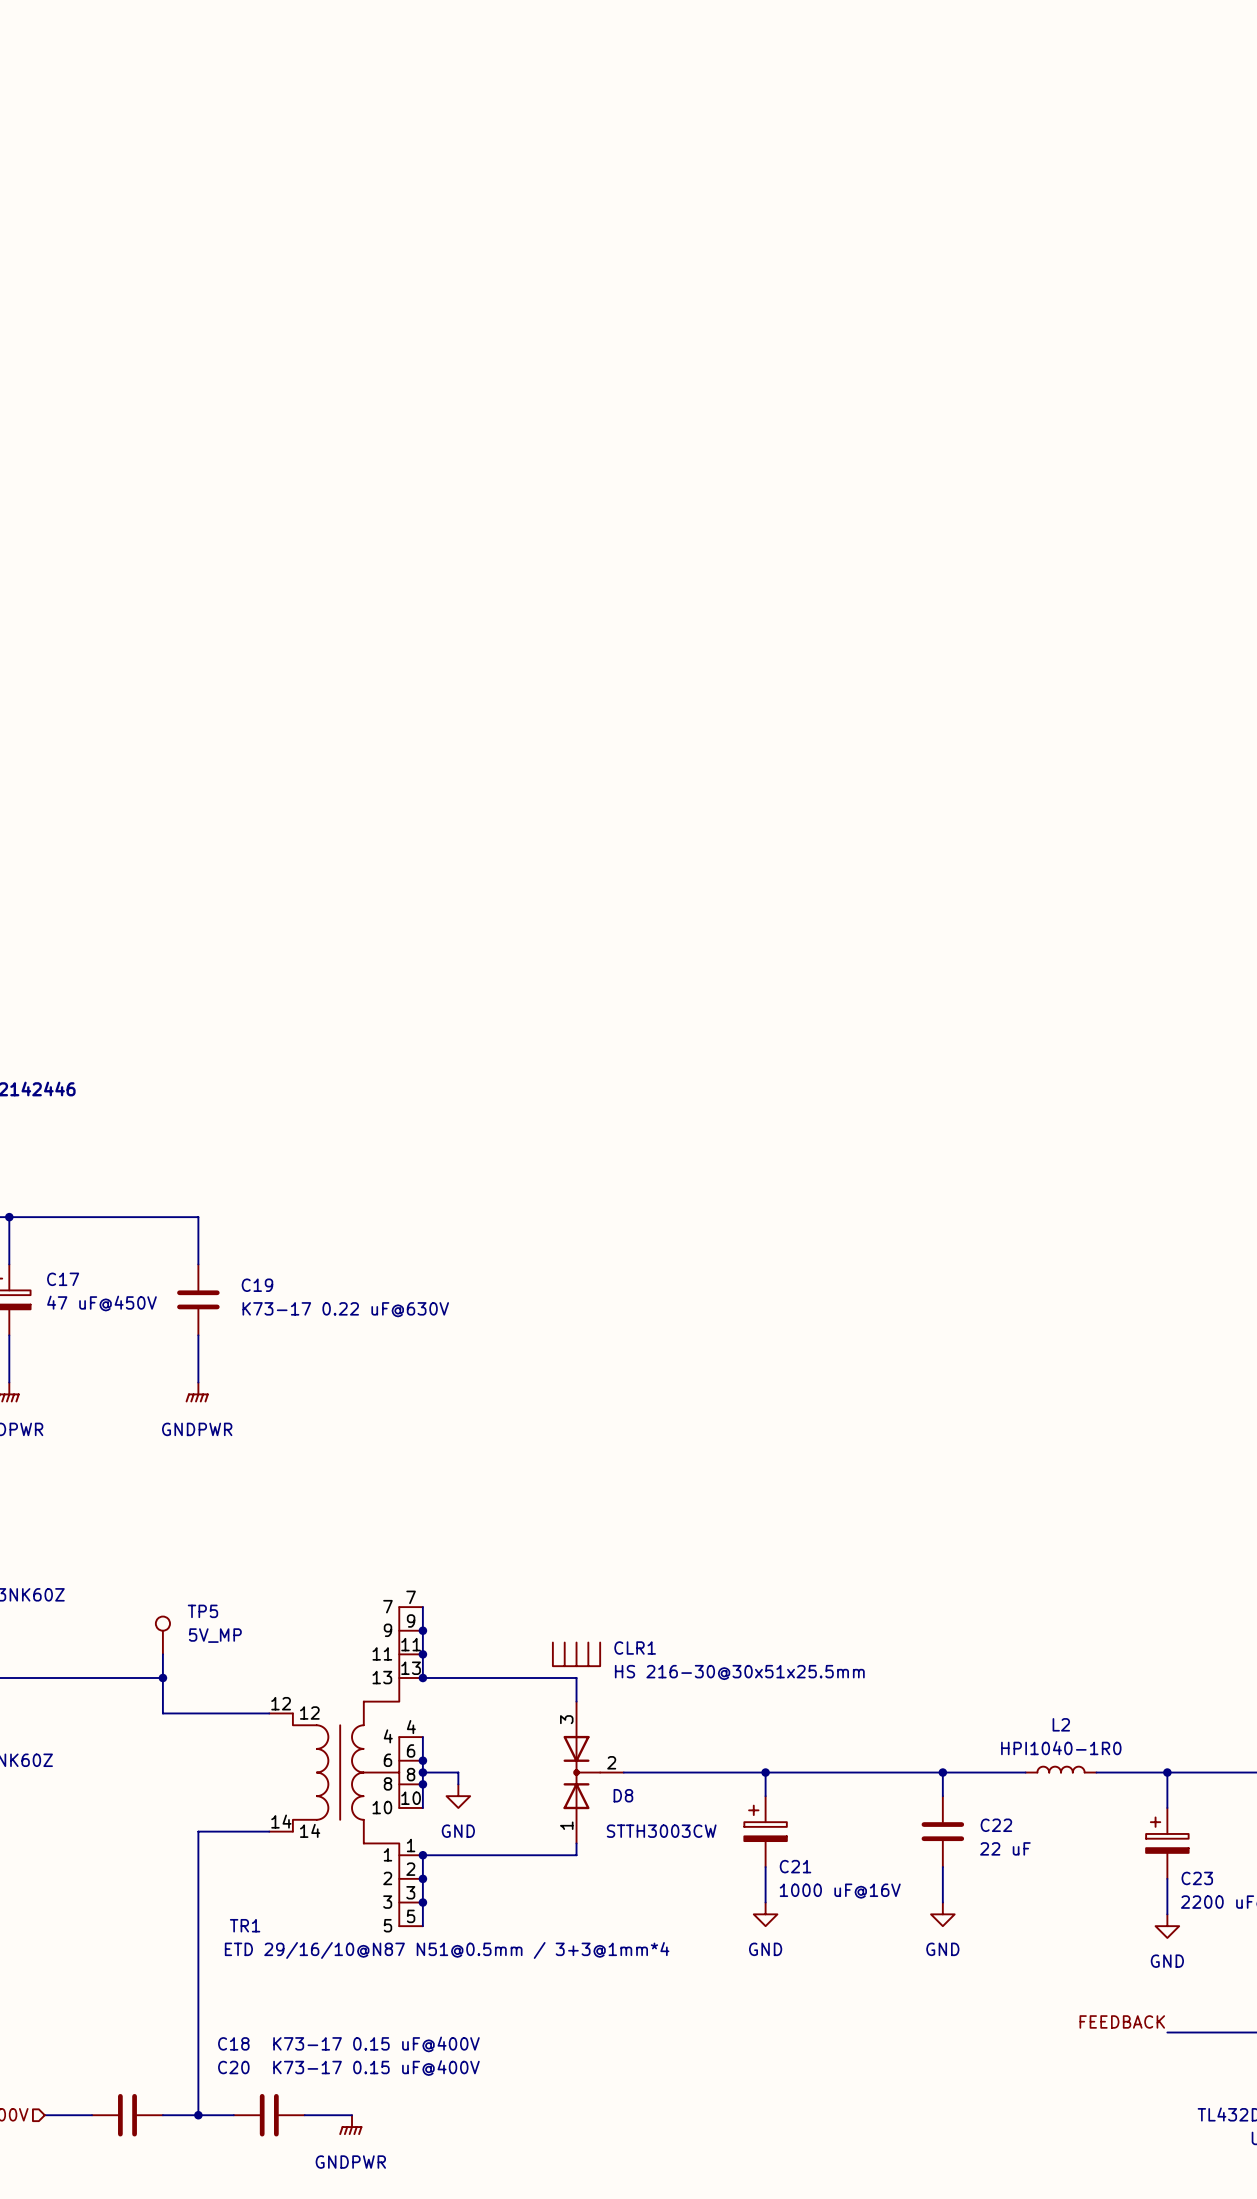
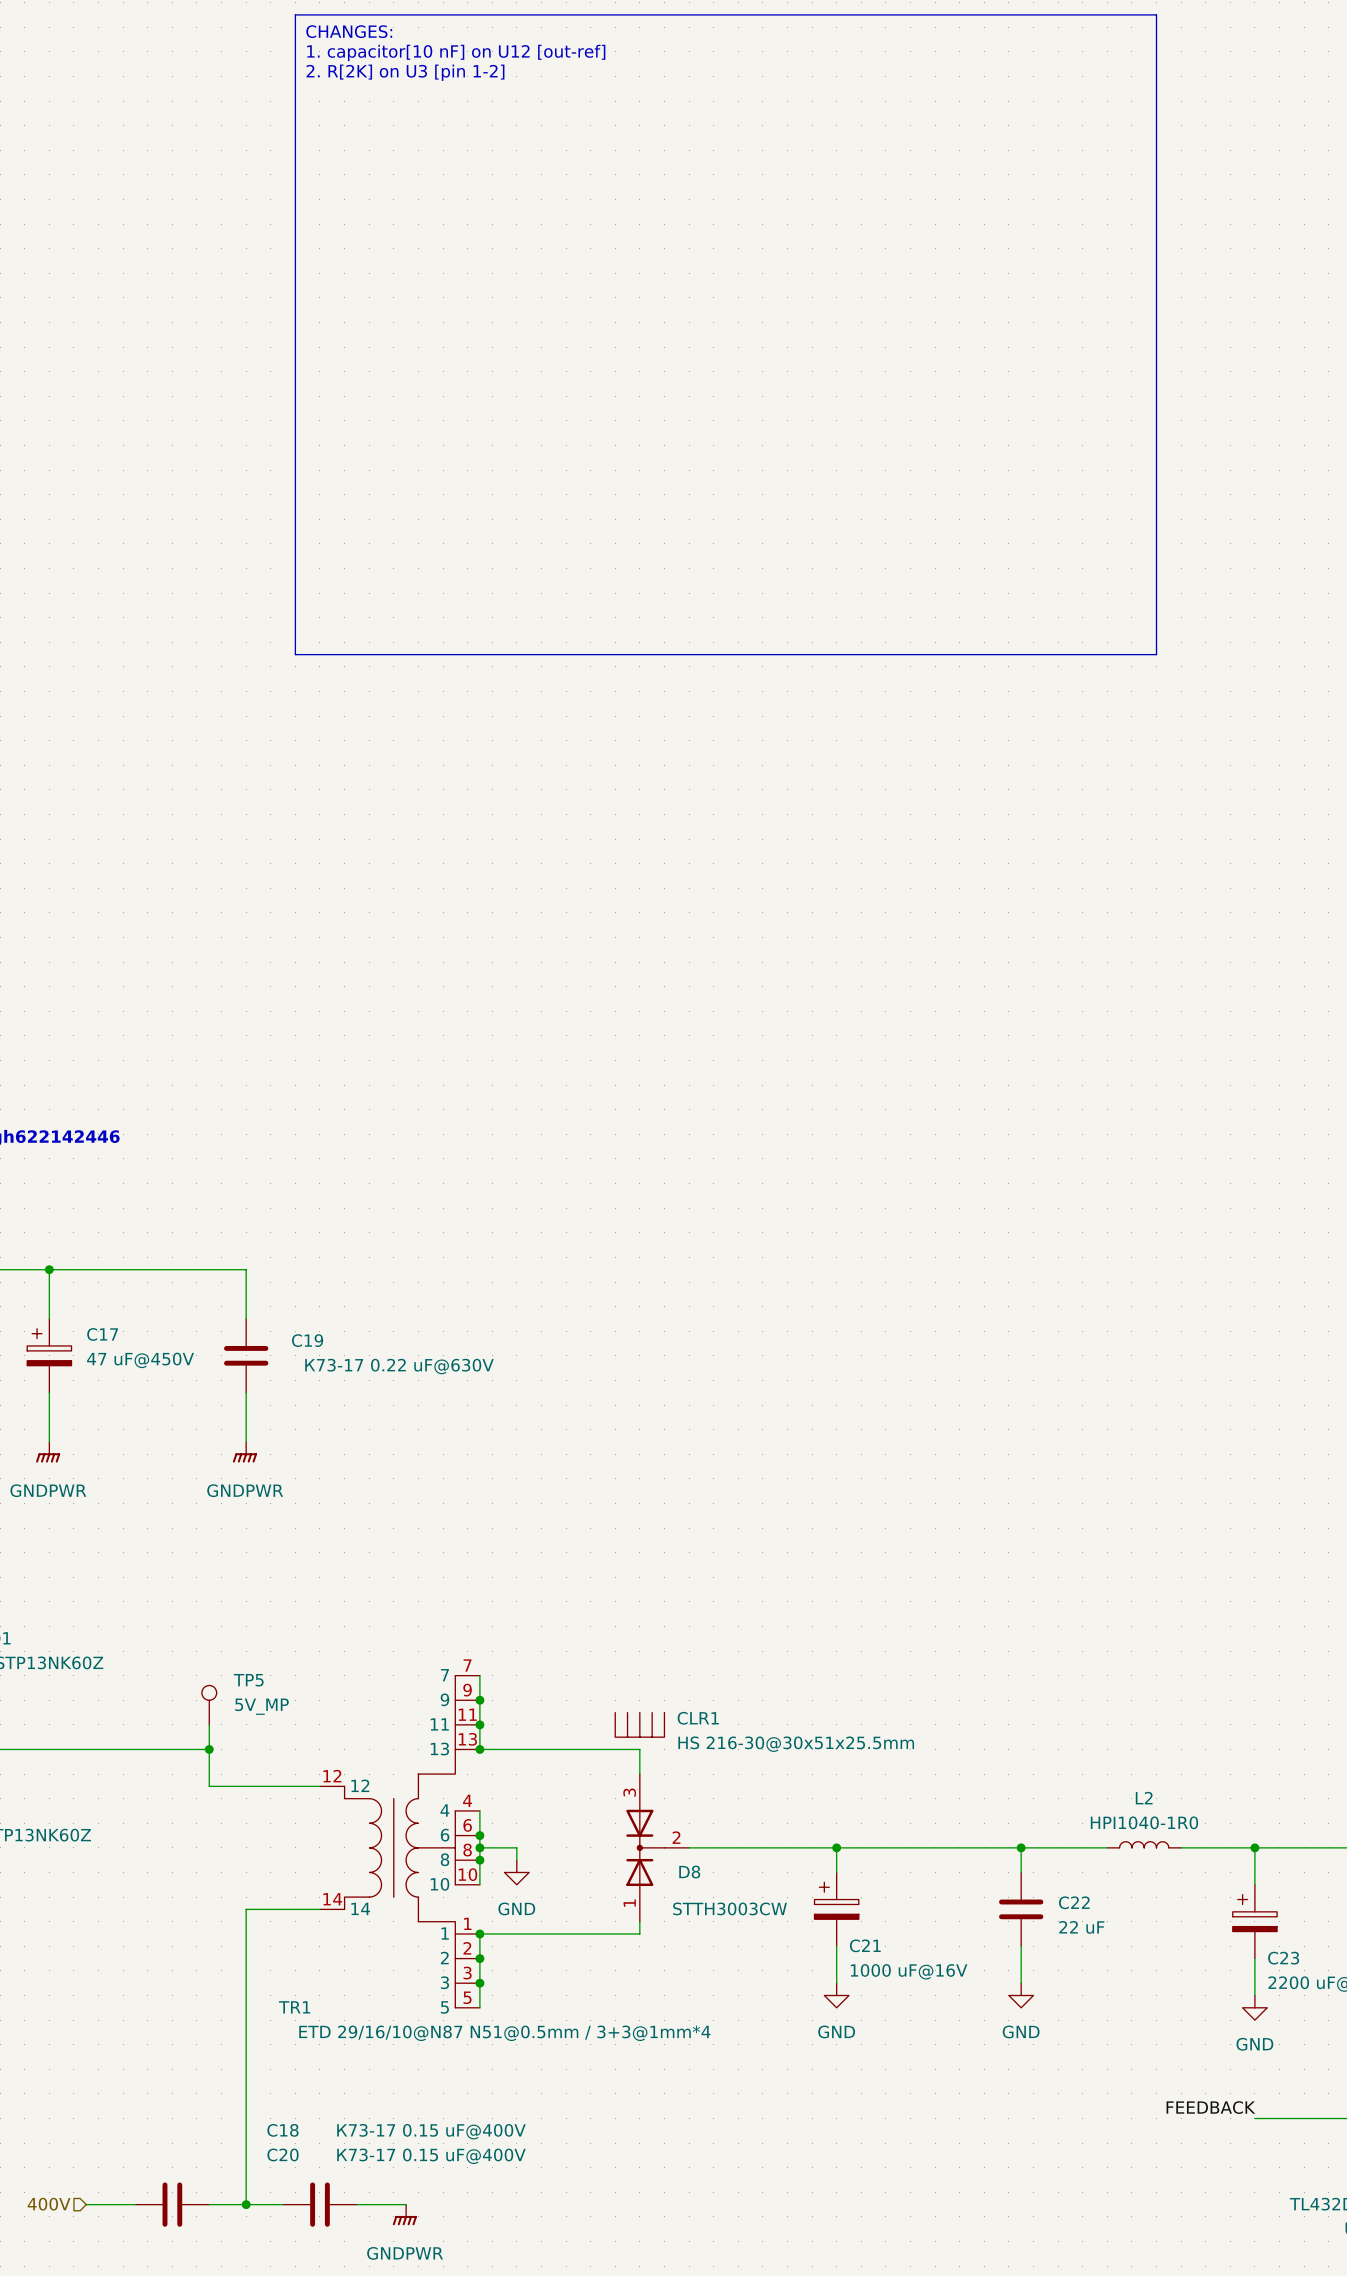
line: none -> (295, 14) (1156, 14) (1156, 654) (295, 654) (295, 14)
text: none -> CHANGES: (349, 31)
text: none -> 1. capacitor[10 nF] on U12 [out-ref] (456, 52)
text: none -> 2. R[2K] on U3 [pin 1-2] (405, 72)

